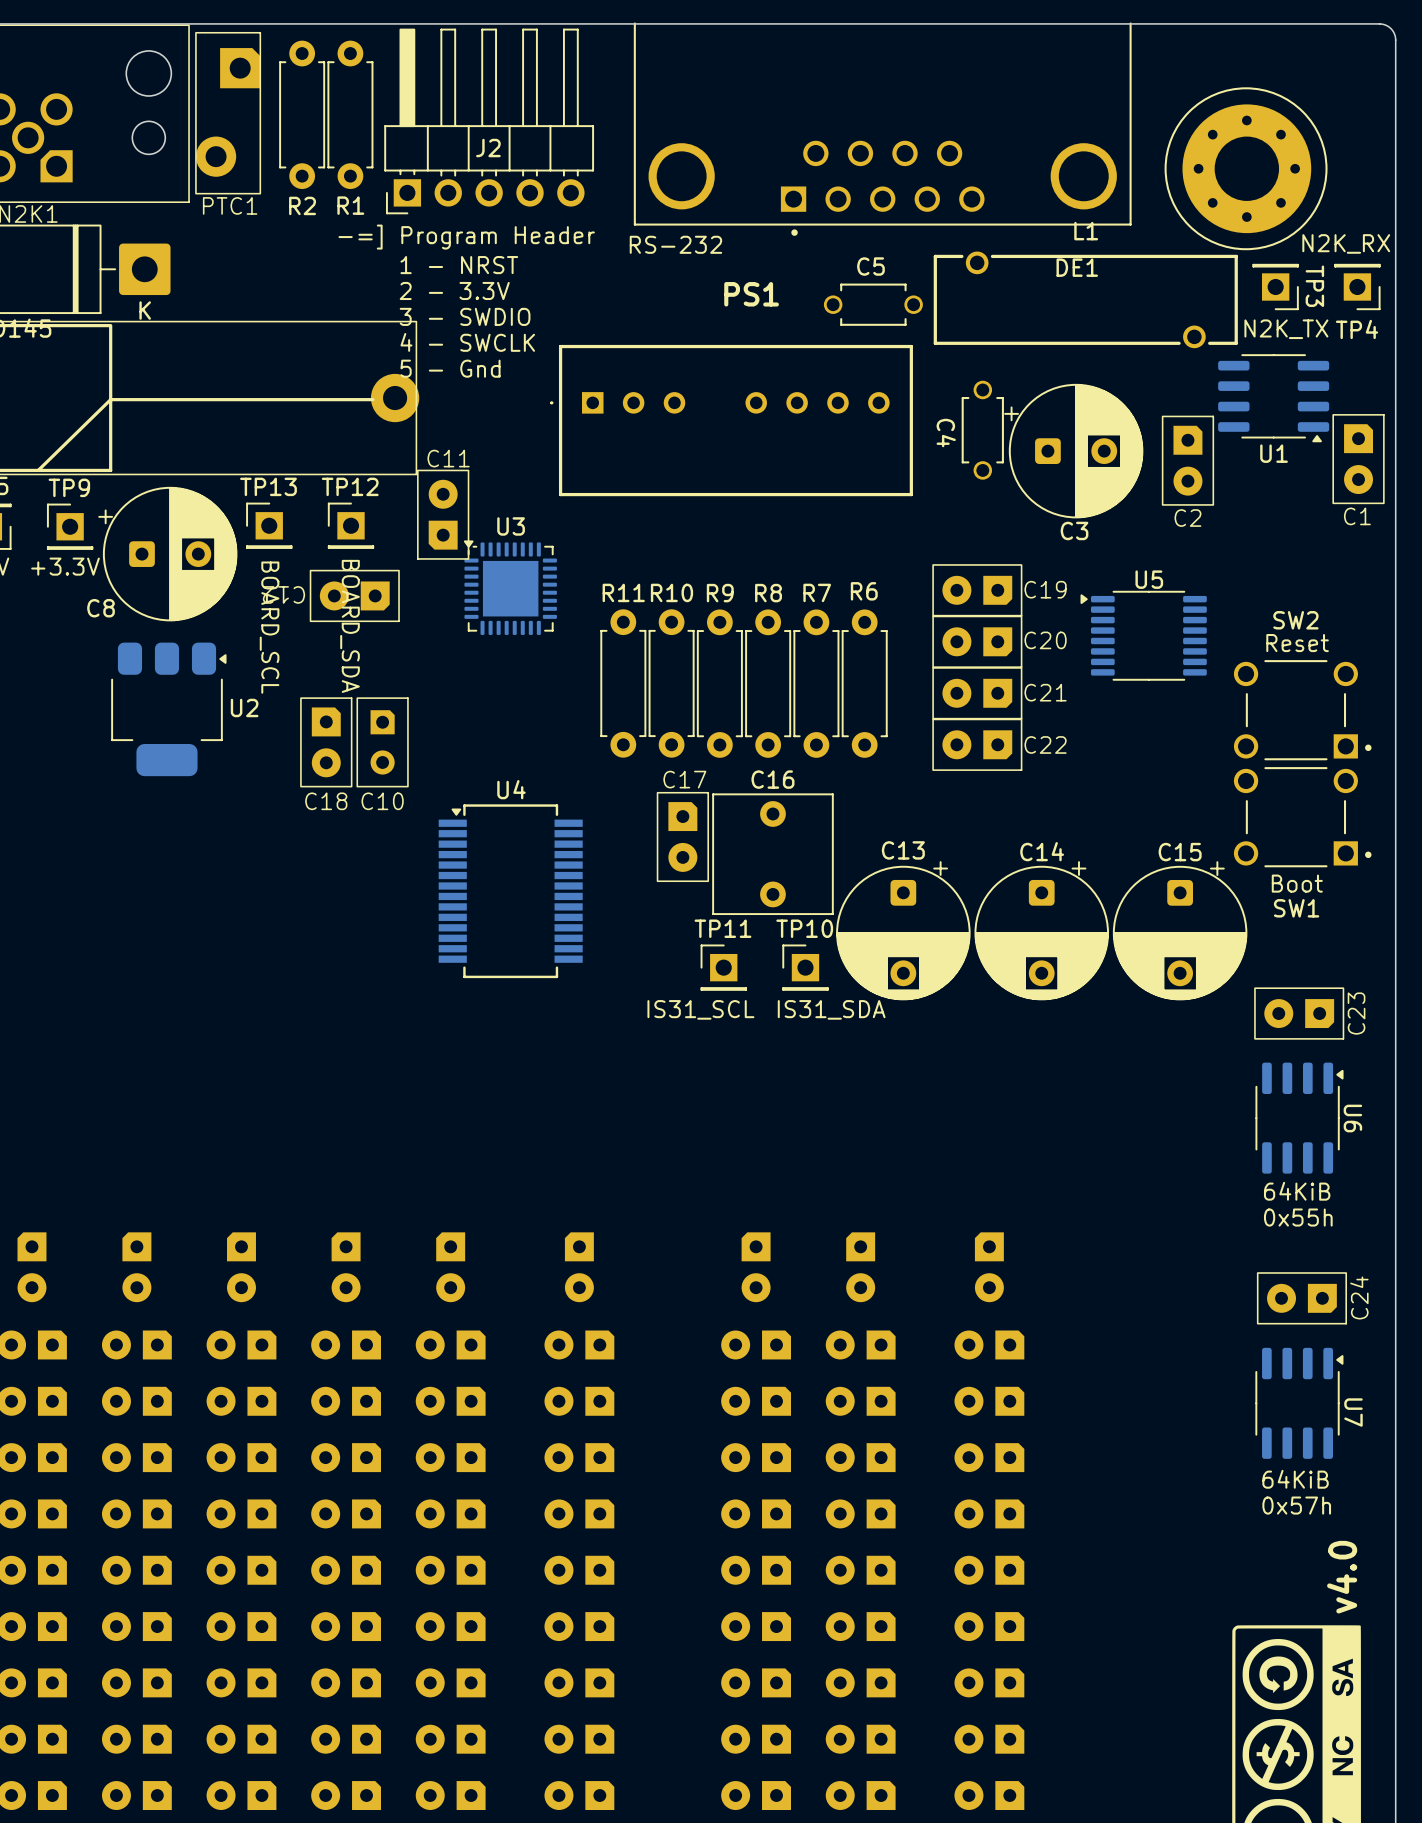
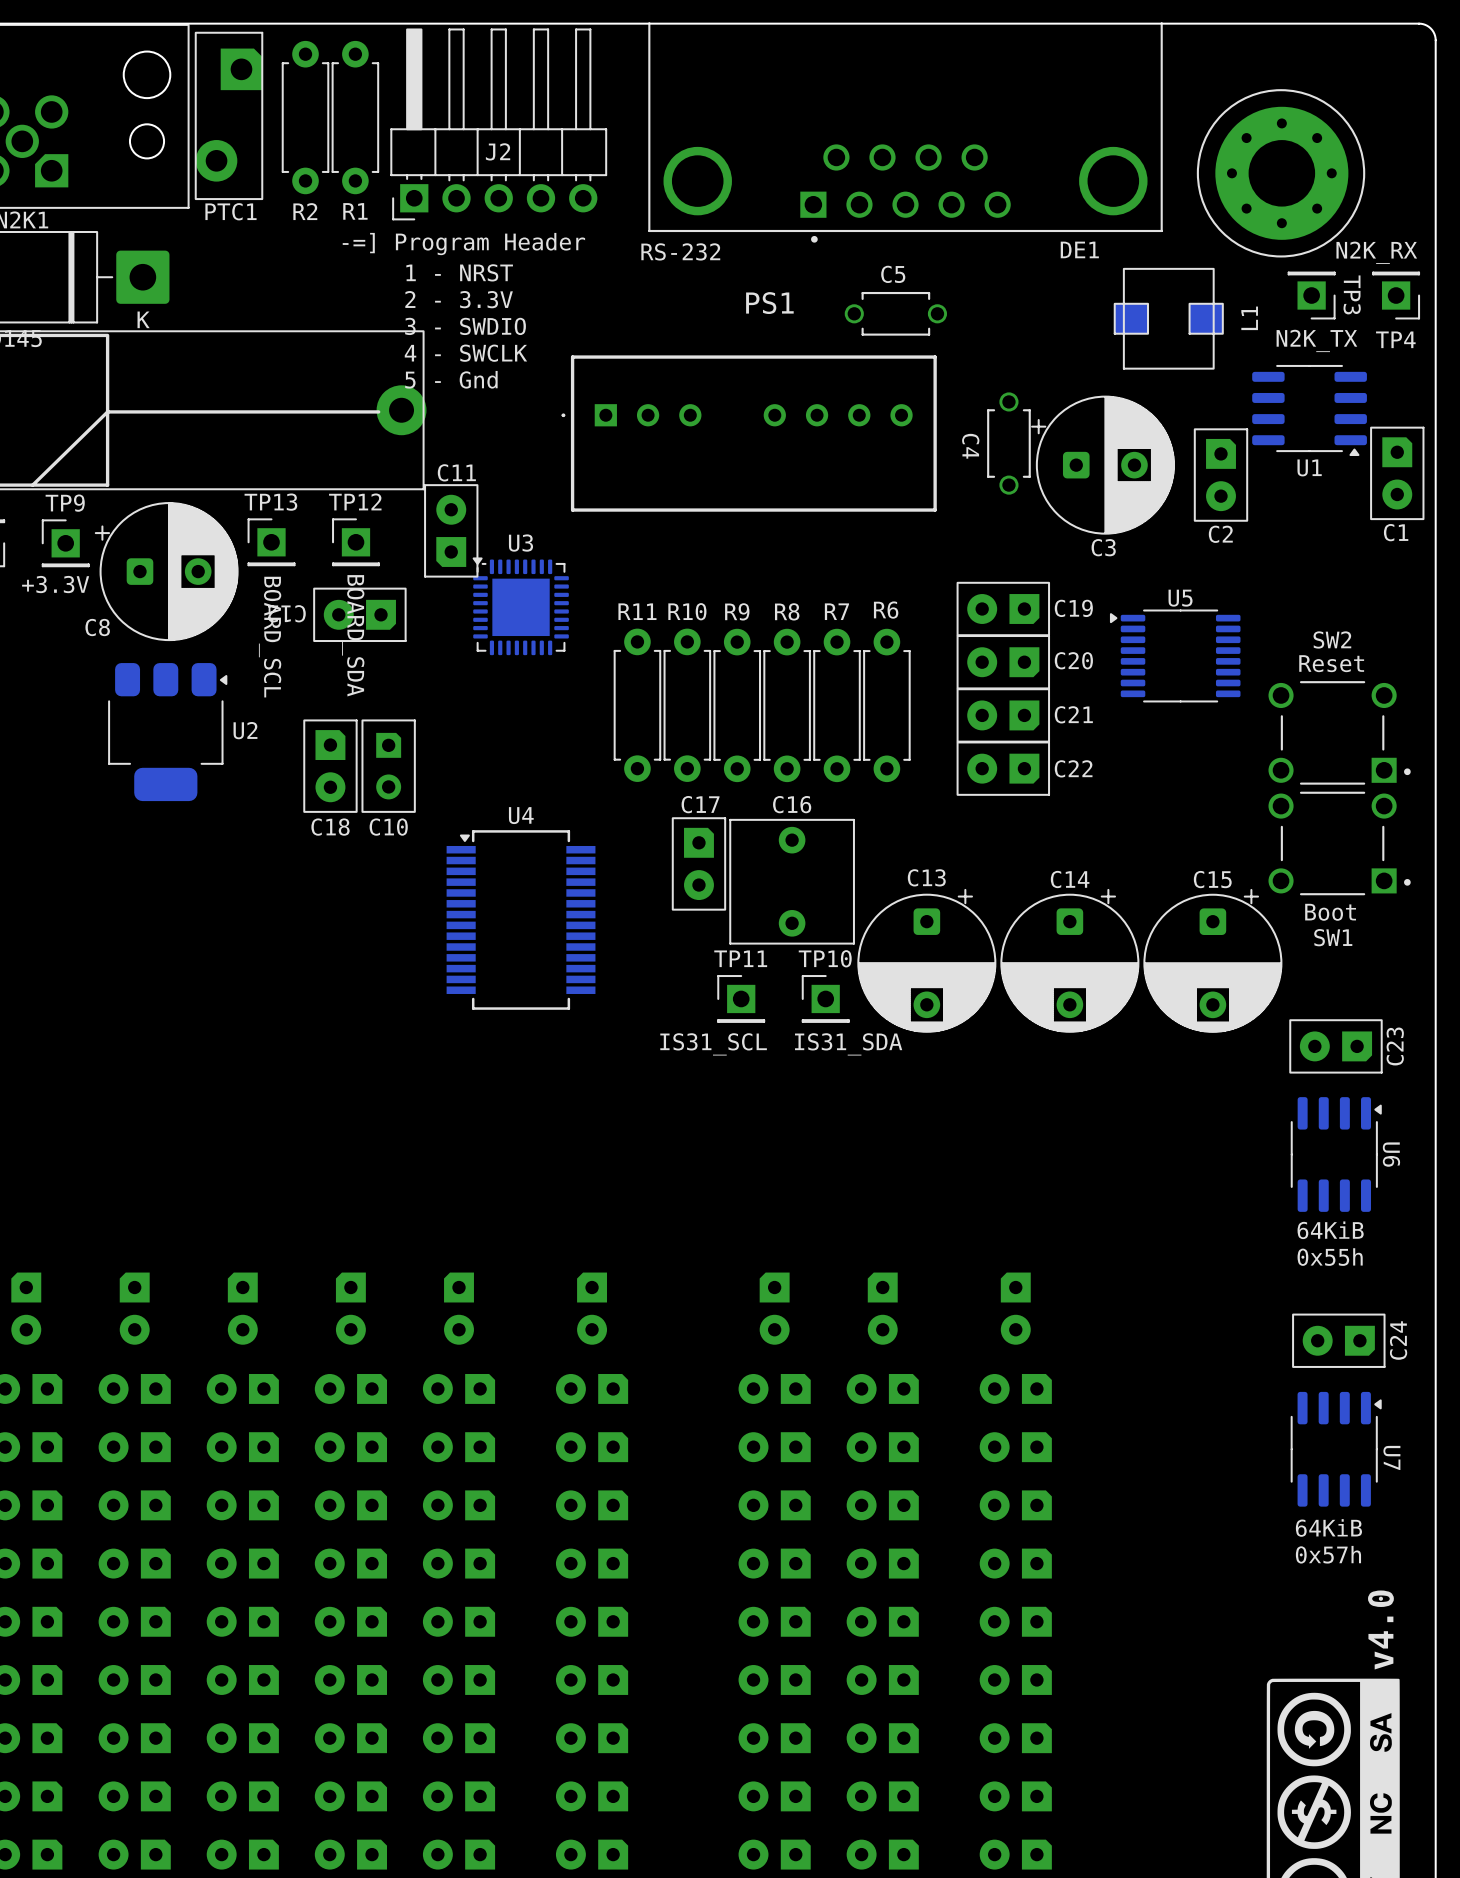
L1 name position: L1 (1086, 231) -> L1 (1249, 318)
L1 footprint: [933, 251, 1238, 349] -> [1113, 268, 1224, 370]
DE1 name position: DE1 (1077, 267) -> DE1 (1079, 249)

